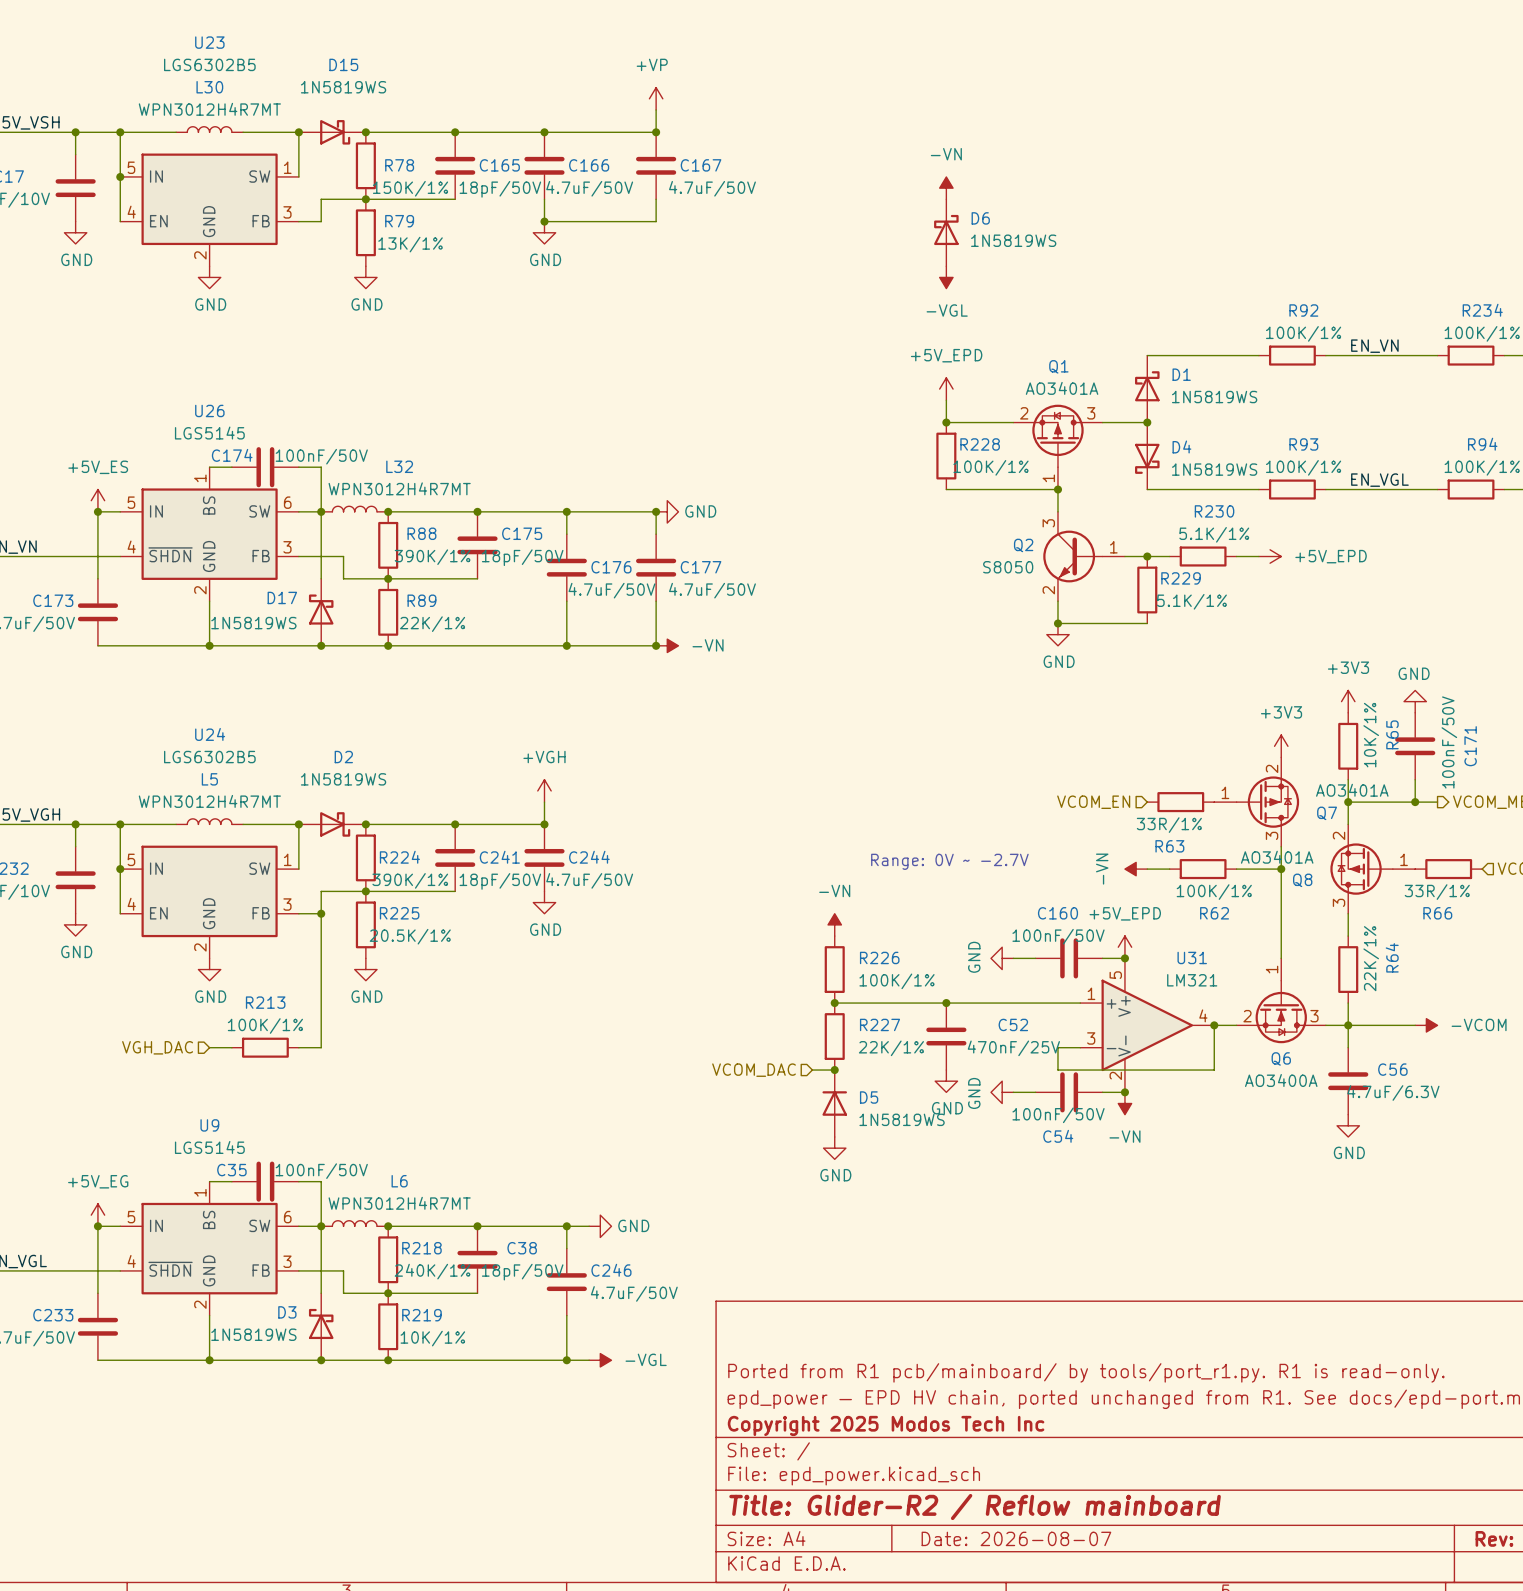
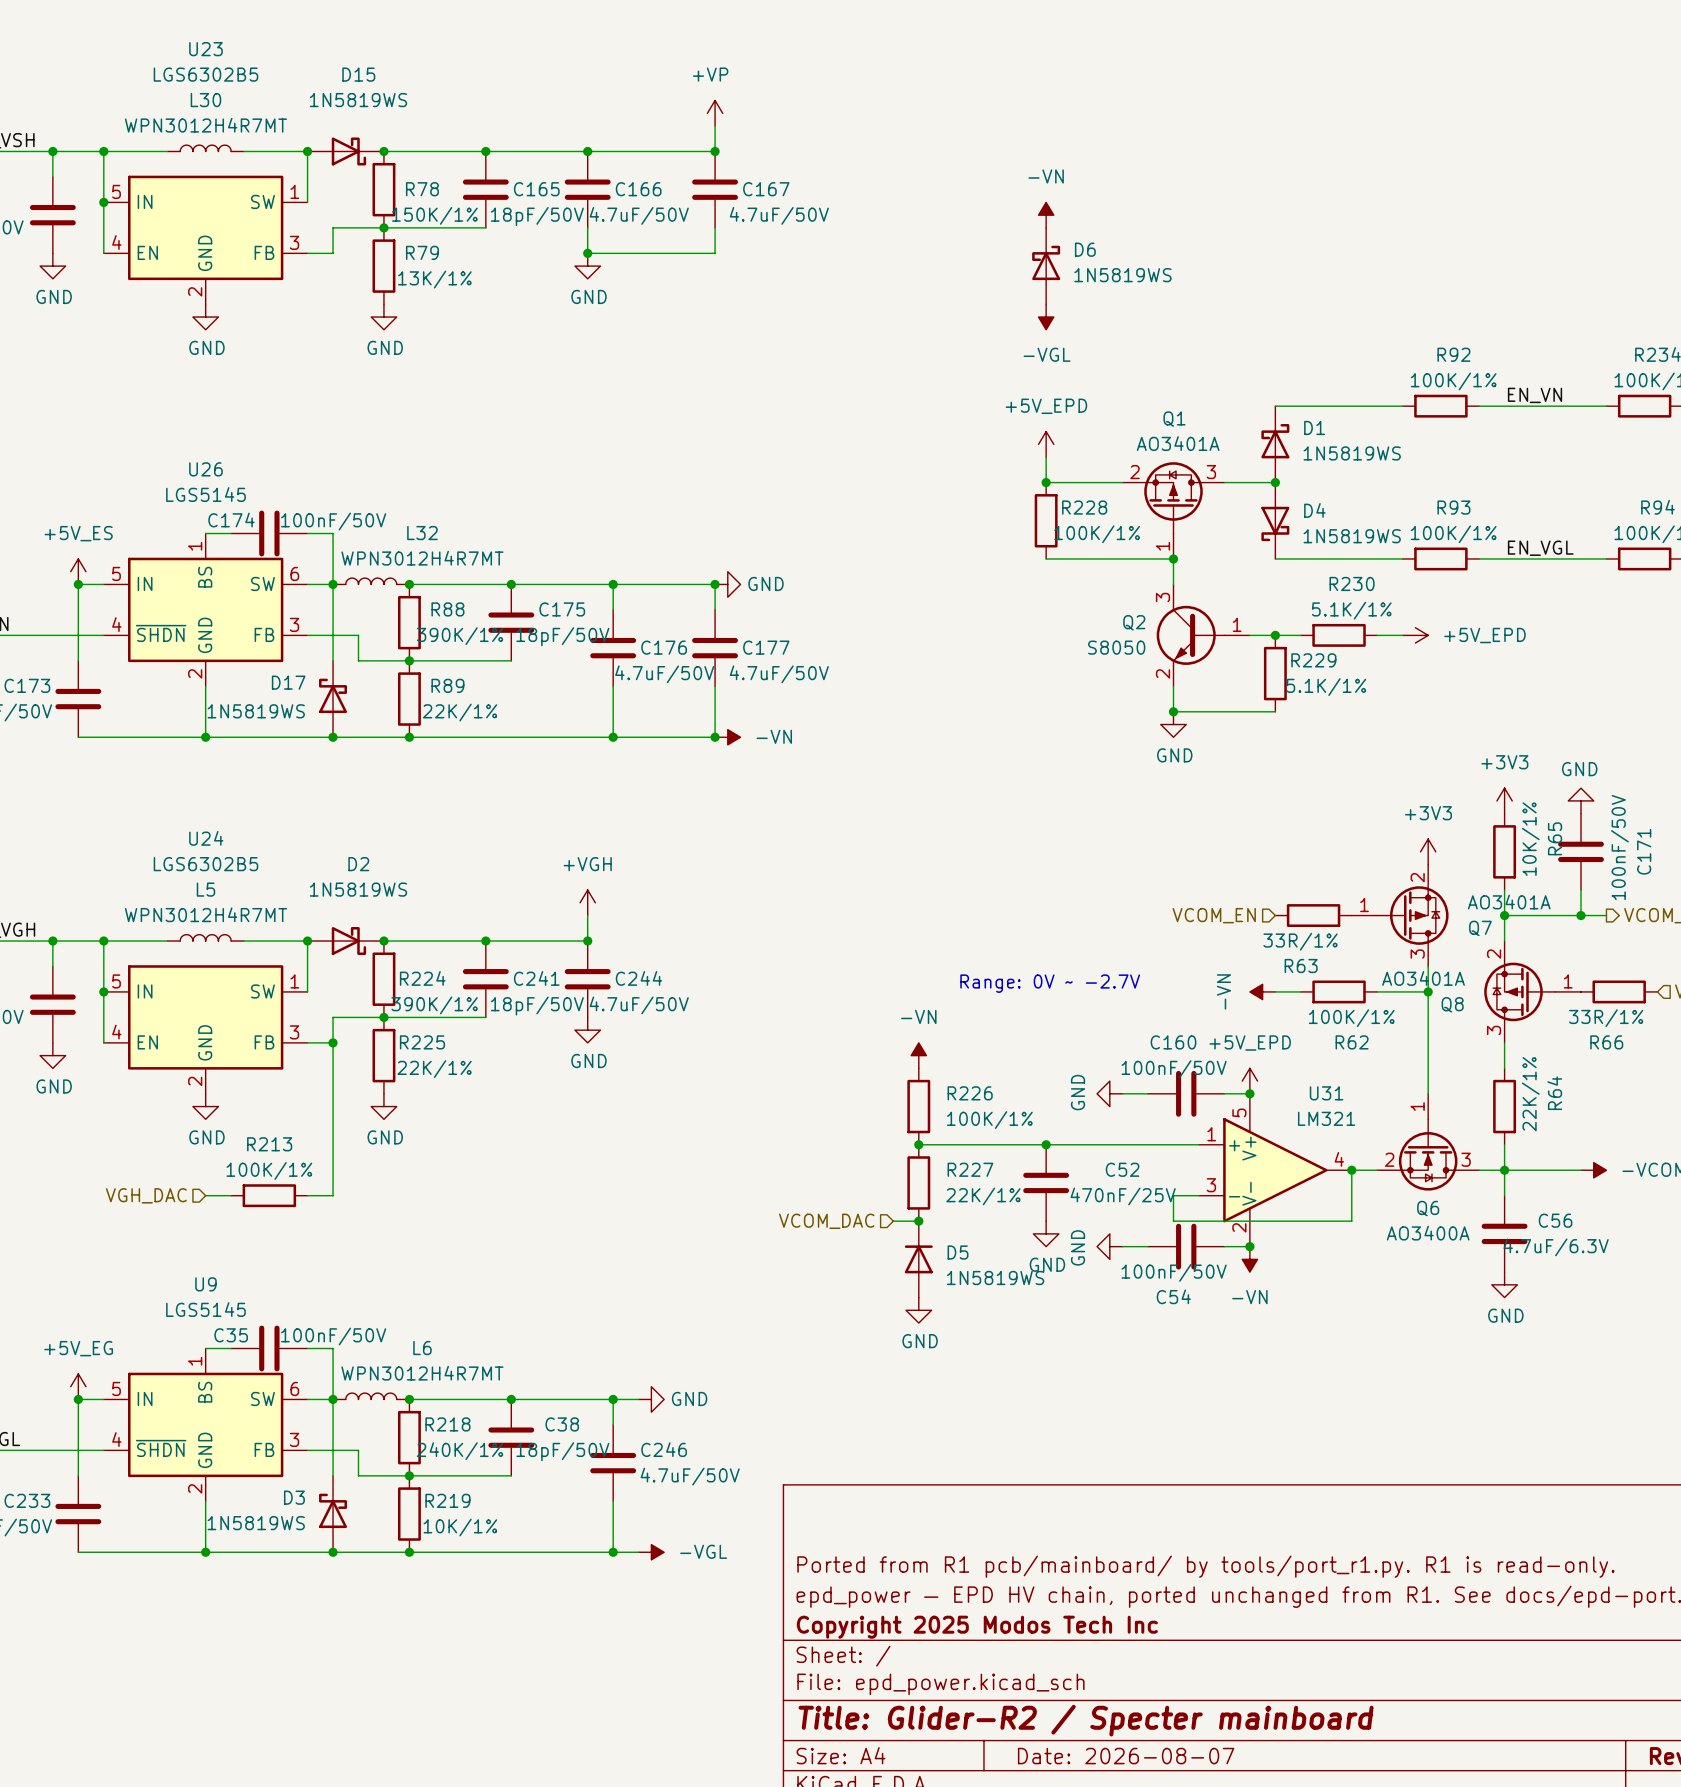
R225 value: 20.5K/1% (410, 936) -> 22K/1% (434, 1069)
title block: Title: Glider-R2 / Reflow mainboard (975, 1507) -> Title: Glider-R2 / Specter mainboard (1086, 1720)

